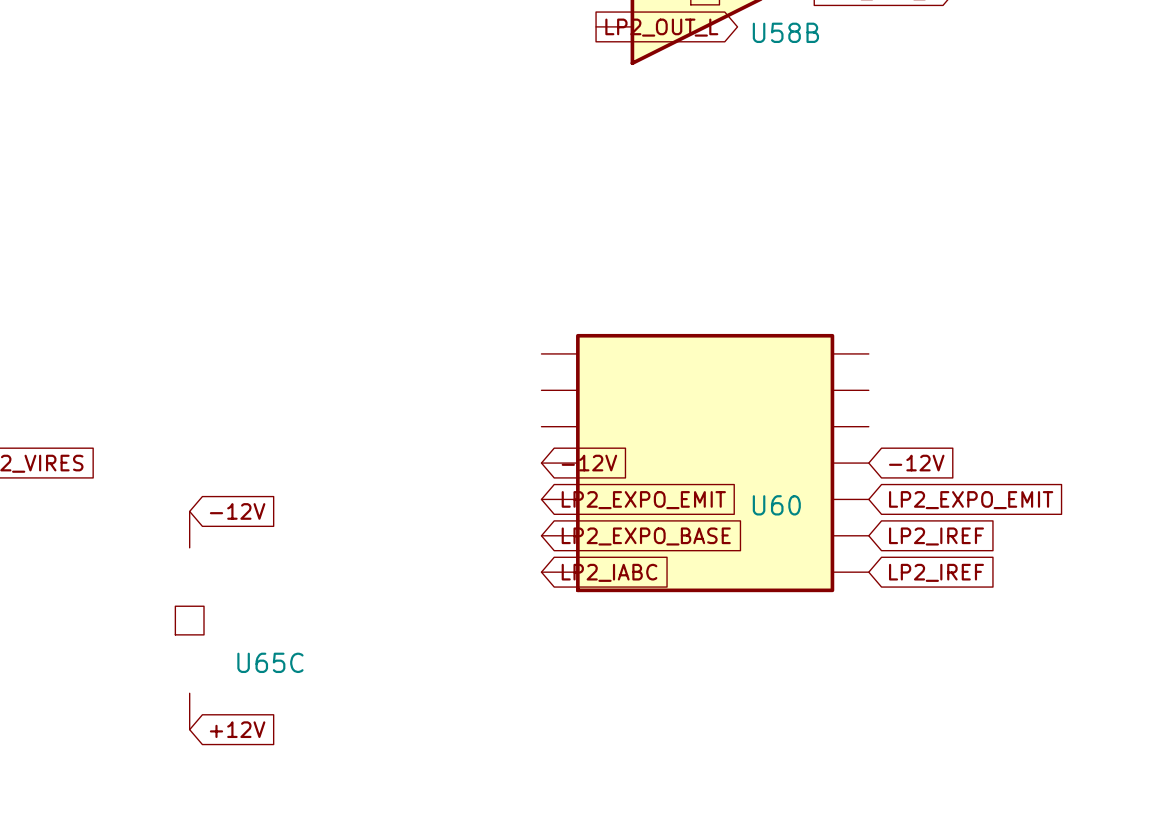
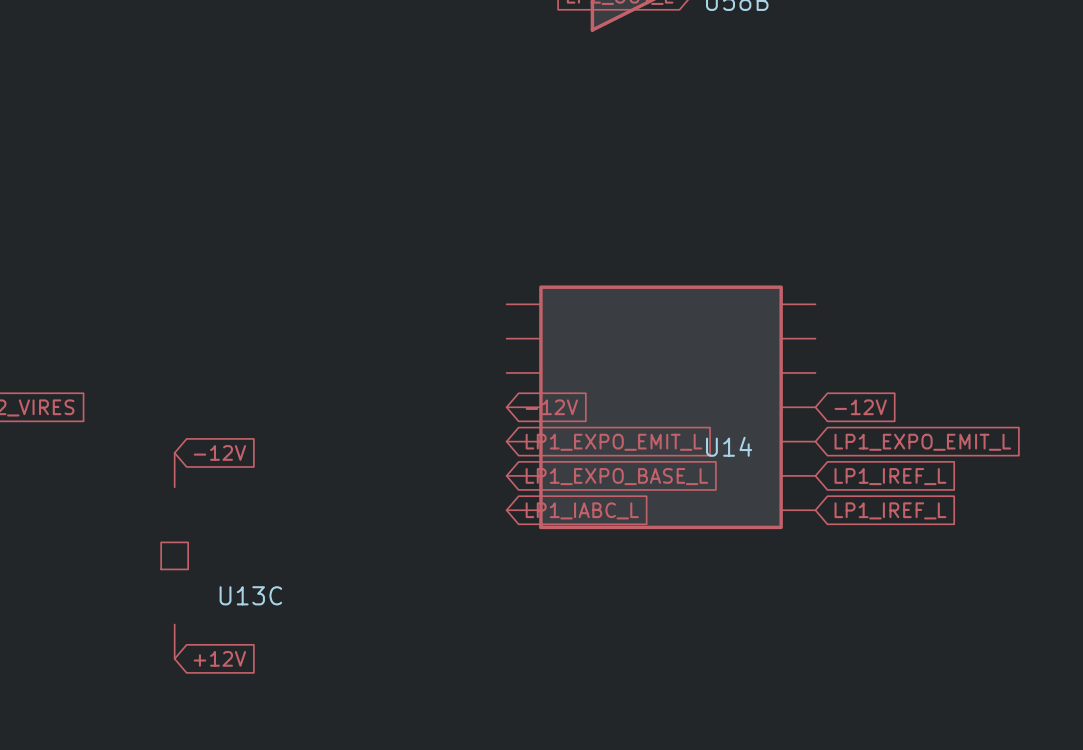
global label: LP2_EXPO_EMIT (643, 500) -> LP1_EXPO_EMIT_L (613, 442)
global label: LP2_EXPO_EMIT (971, 500) -> LP1_EXPO_EMIT_L (922, 442)
U60 name: U60 (776, 505) -> U14 (729, 446)
global label: LP2_EXPO_BASE (646, 536) -> LP1_EXPO_BASE_L (616, 476)
global label: LP2_IREF (936, 536) -> LP1_IREF_L (890, 476)
global label: LP2_IABC (609, 572) -> LP1_IABC_L (582, 510)
global label: LP2_IREF (936, 572) -> LP1_IREF_L (890, 510)
U65C name: U65C (270, 662) -> U13C (250, 595)

